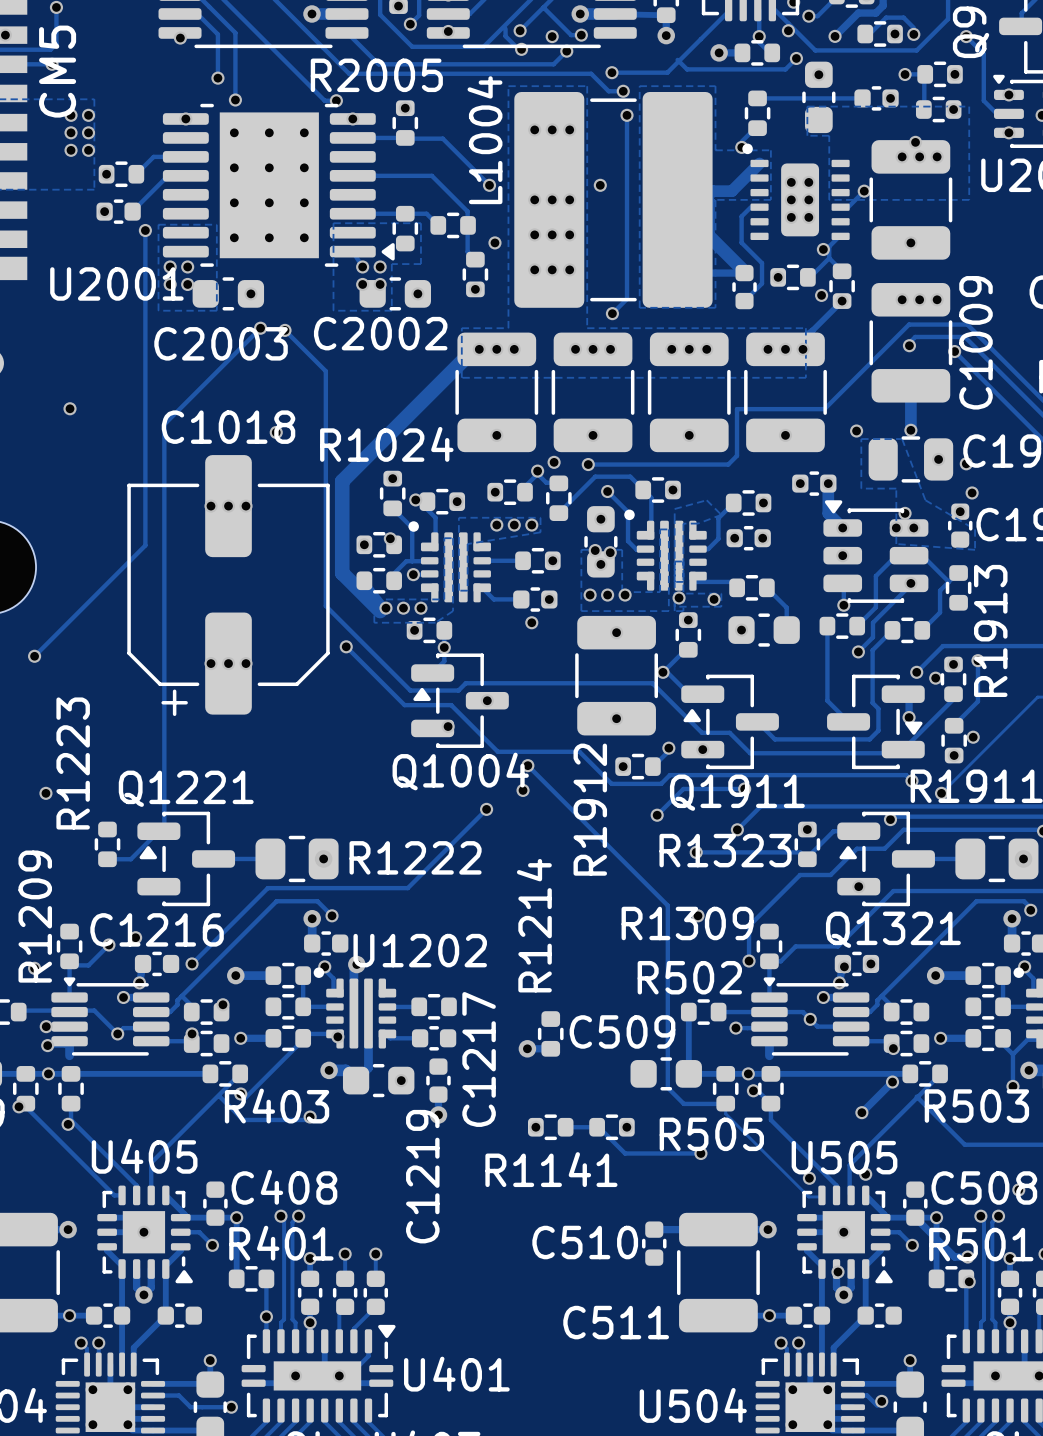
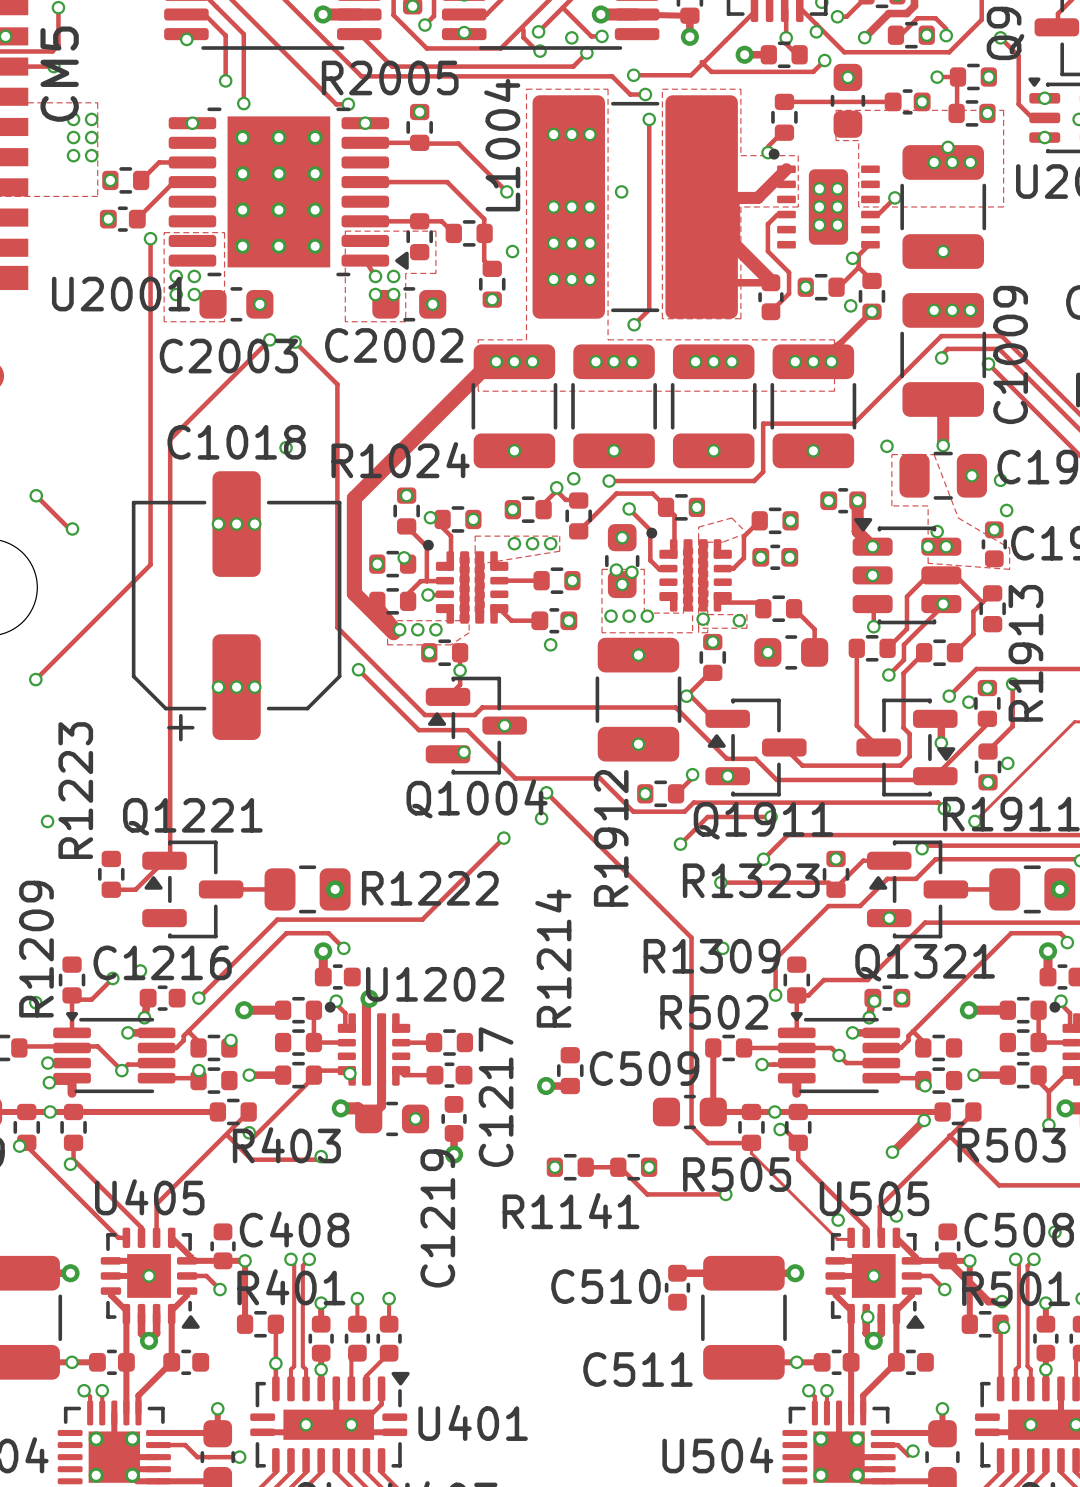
via: (70, 408) -> none
track: none -> (36, 495) (69, 528)
via: none -> (36, 495)
via: none -> (72, 528)

